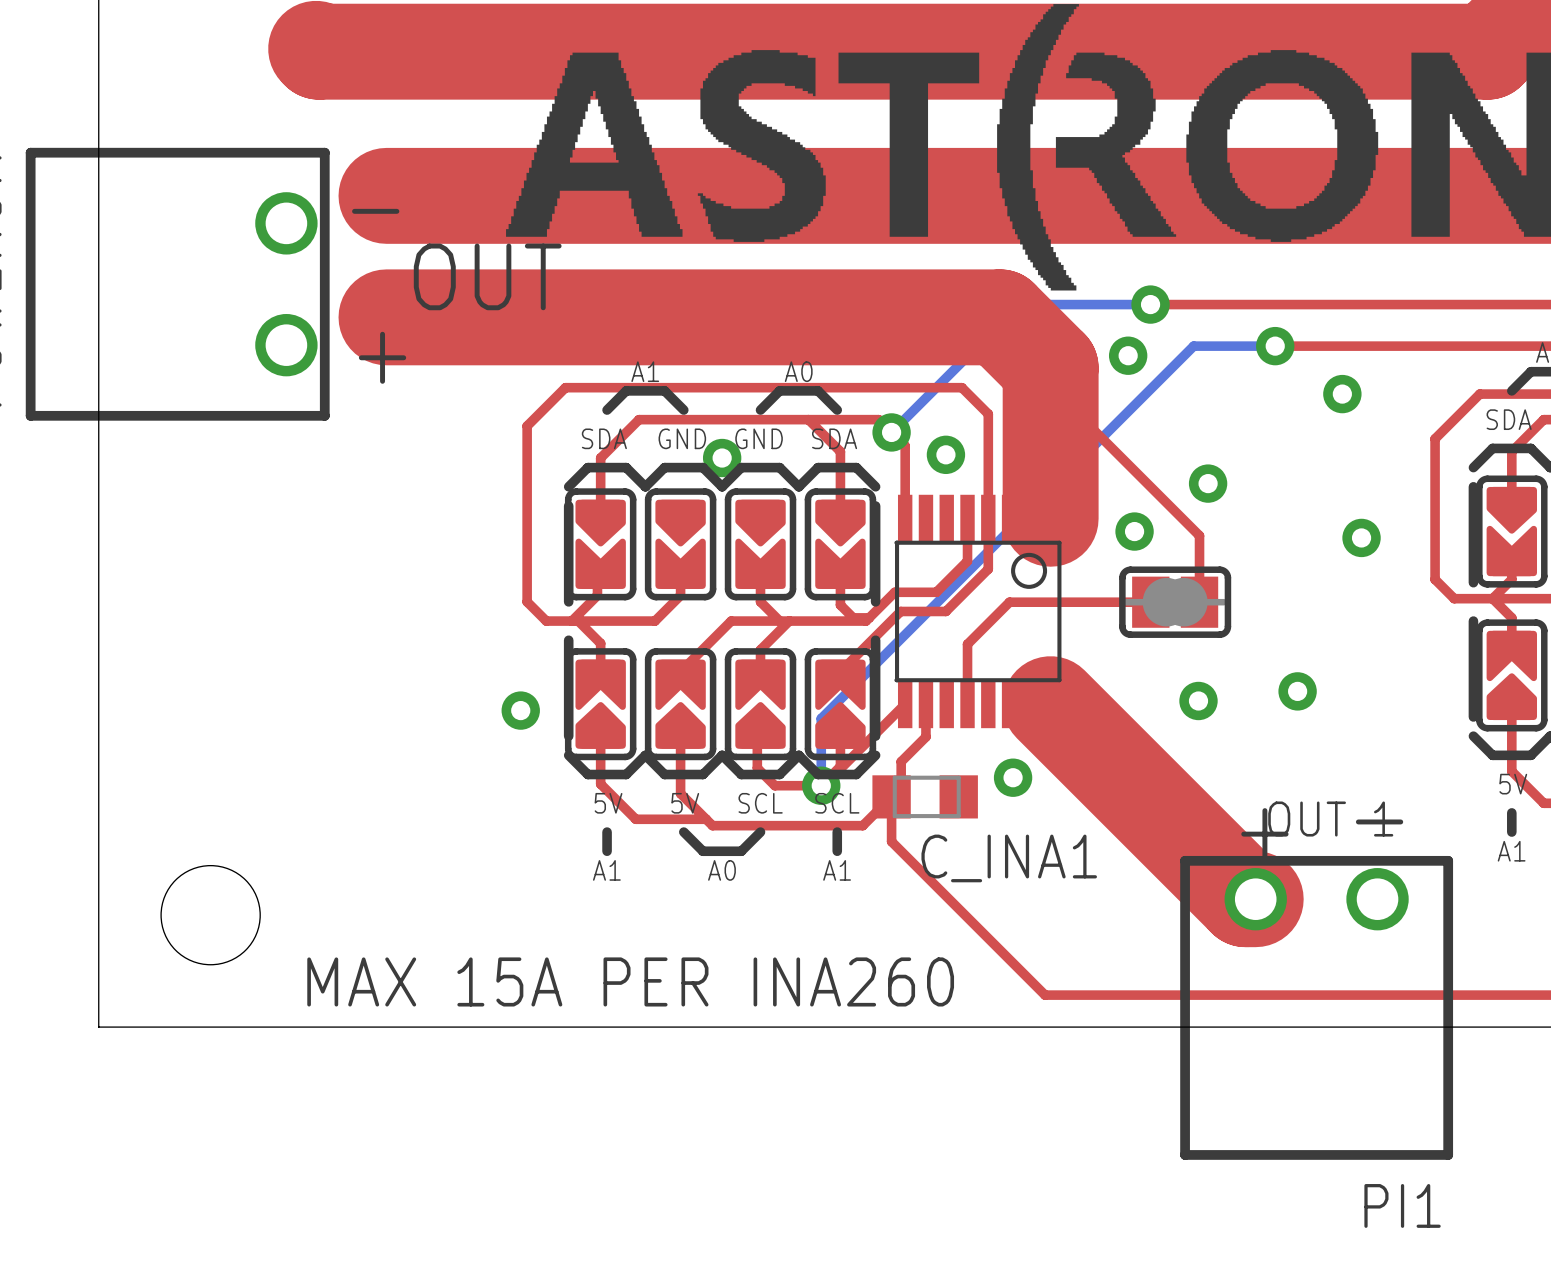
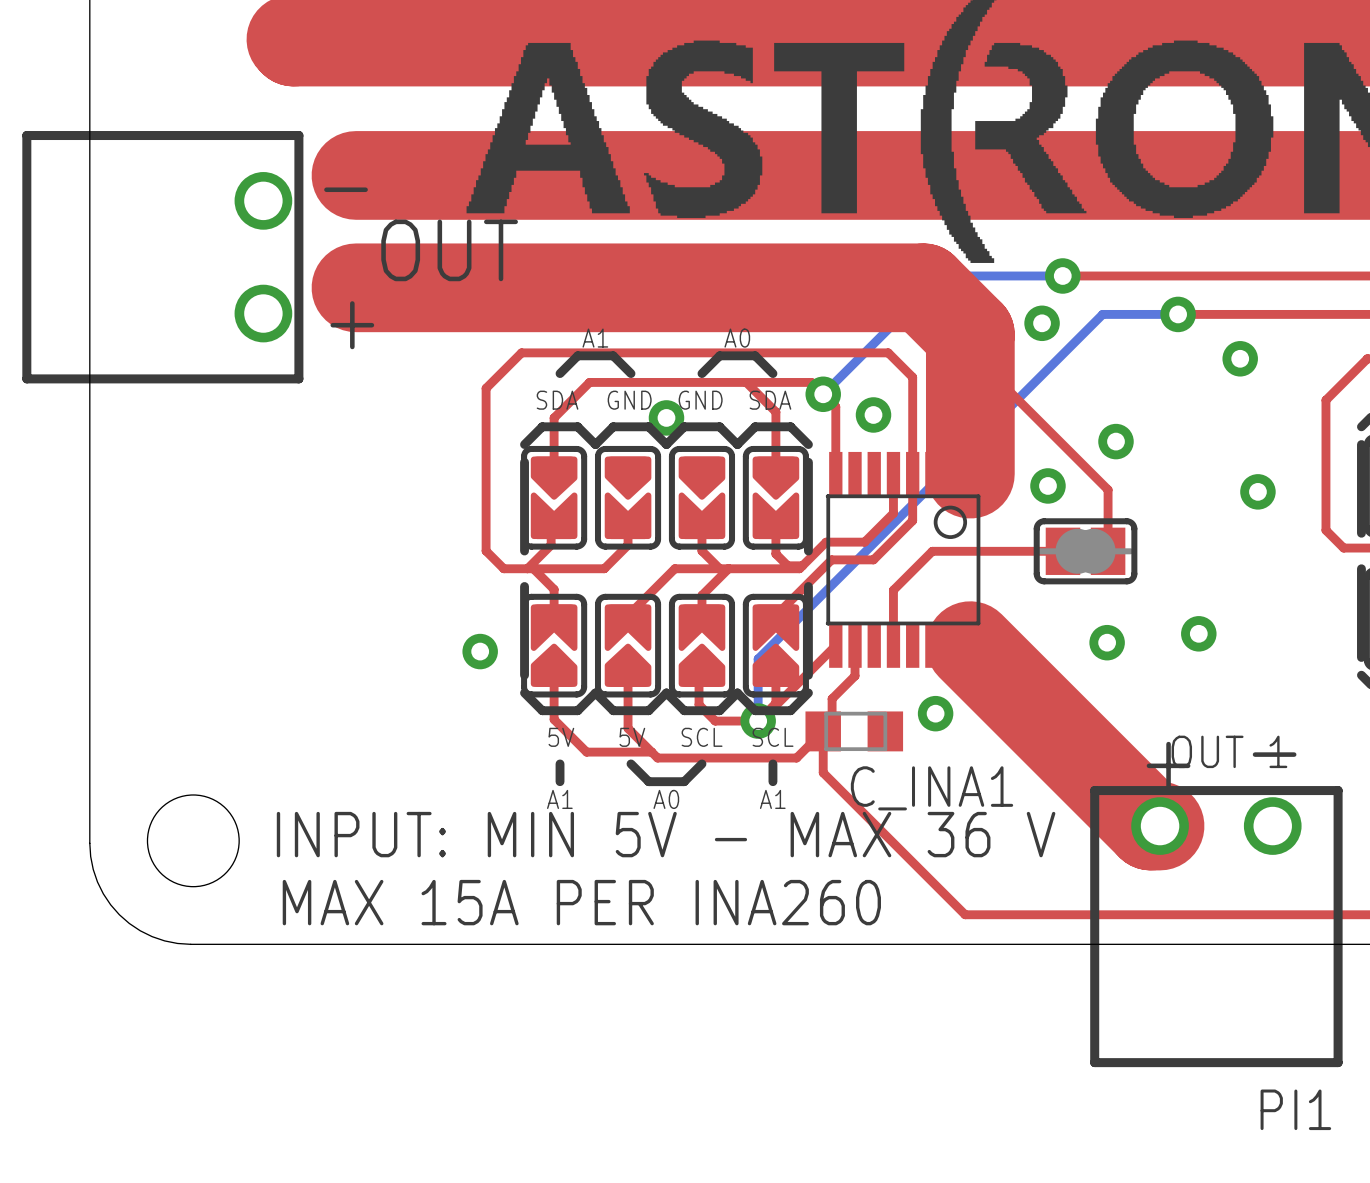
text: none -> INPUT: MIN 5V - MAX 36 V (666, 834)
board edge: (98, 917) (98, 1027) (207, 1027) -> (89, 843) (93, 869) (97, 882) (110, 904) (119, 914) (129, 923) (152, 936) (164, 940) (190, 944)

